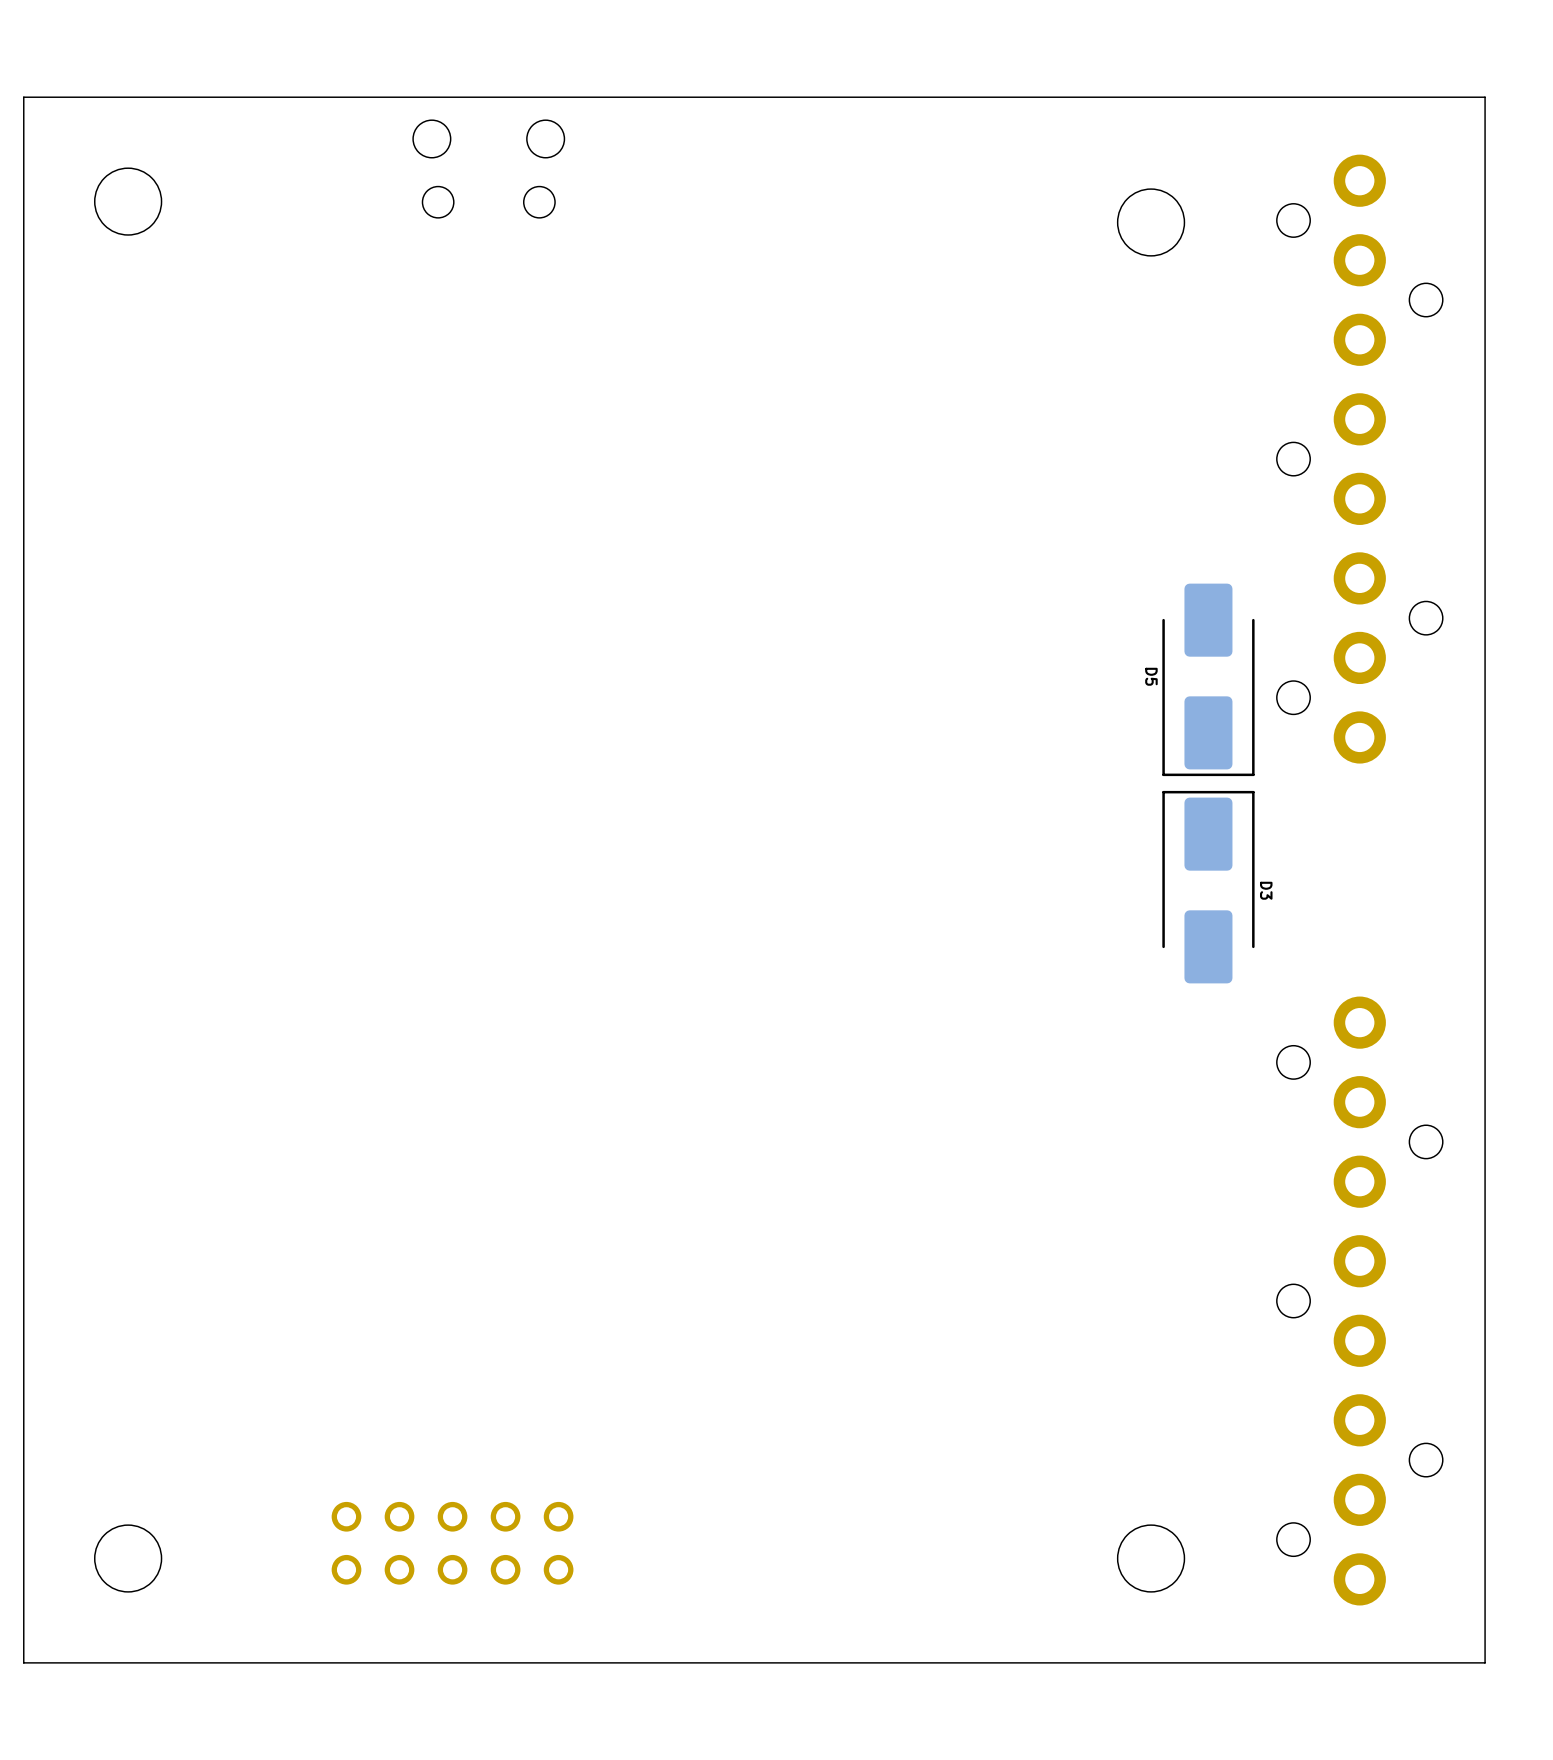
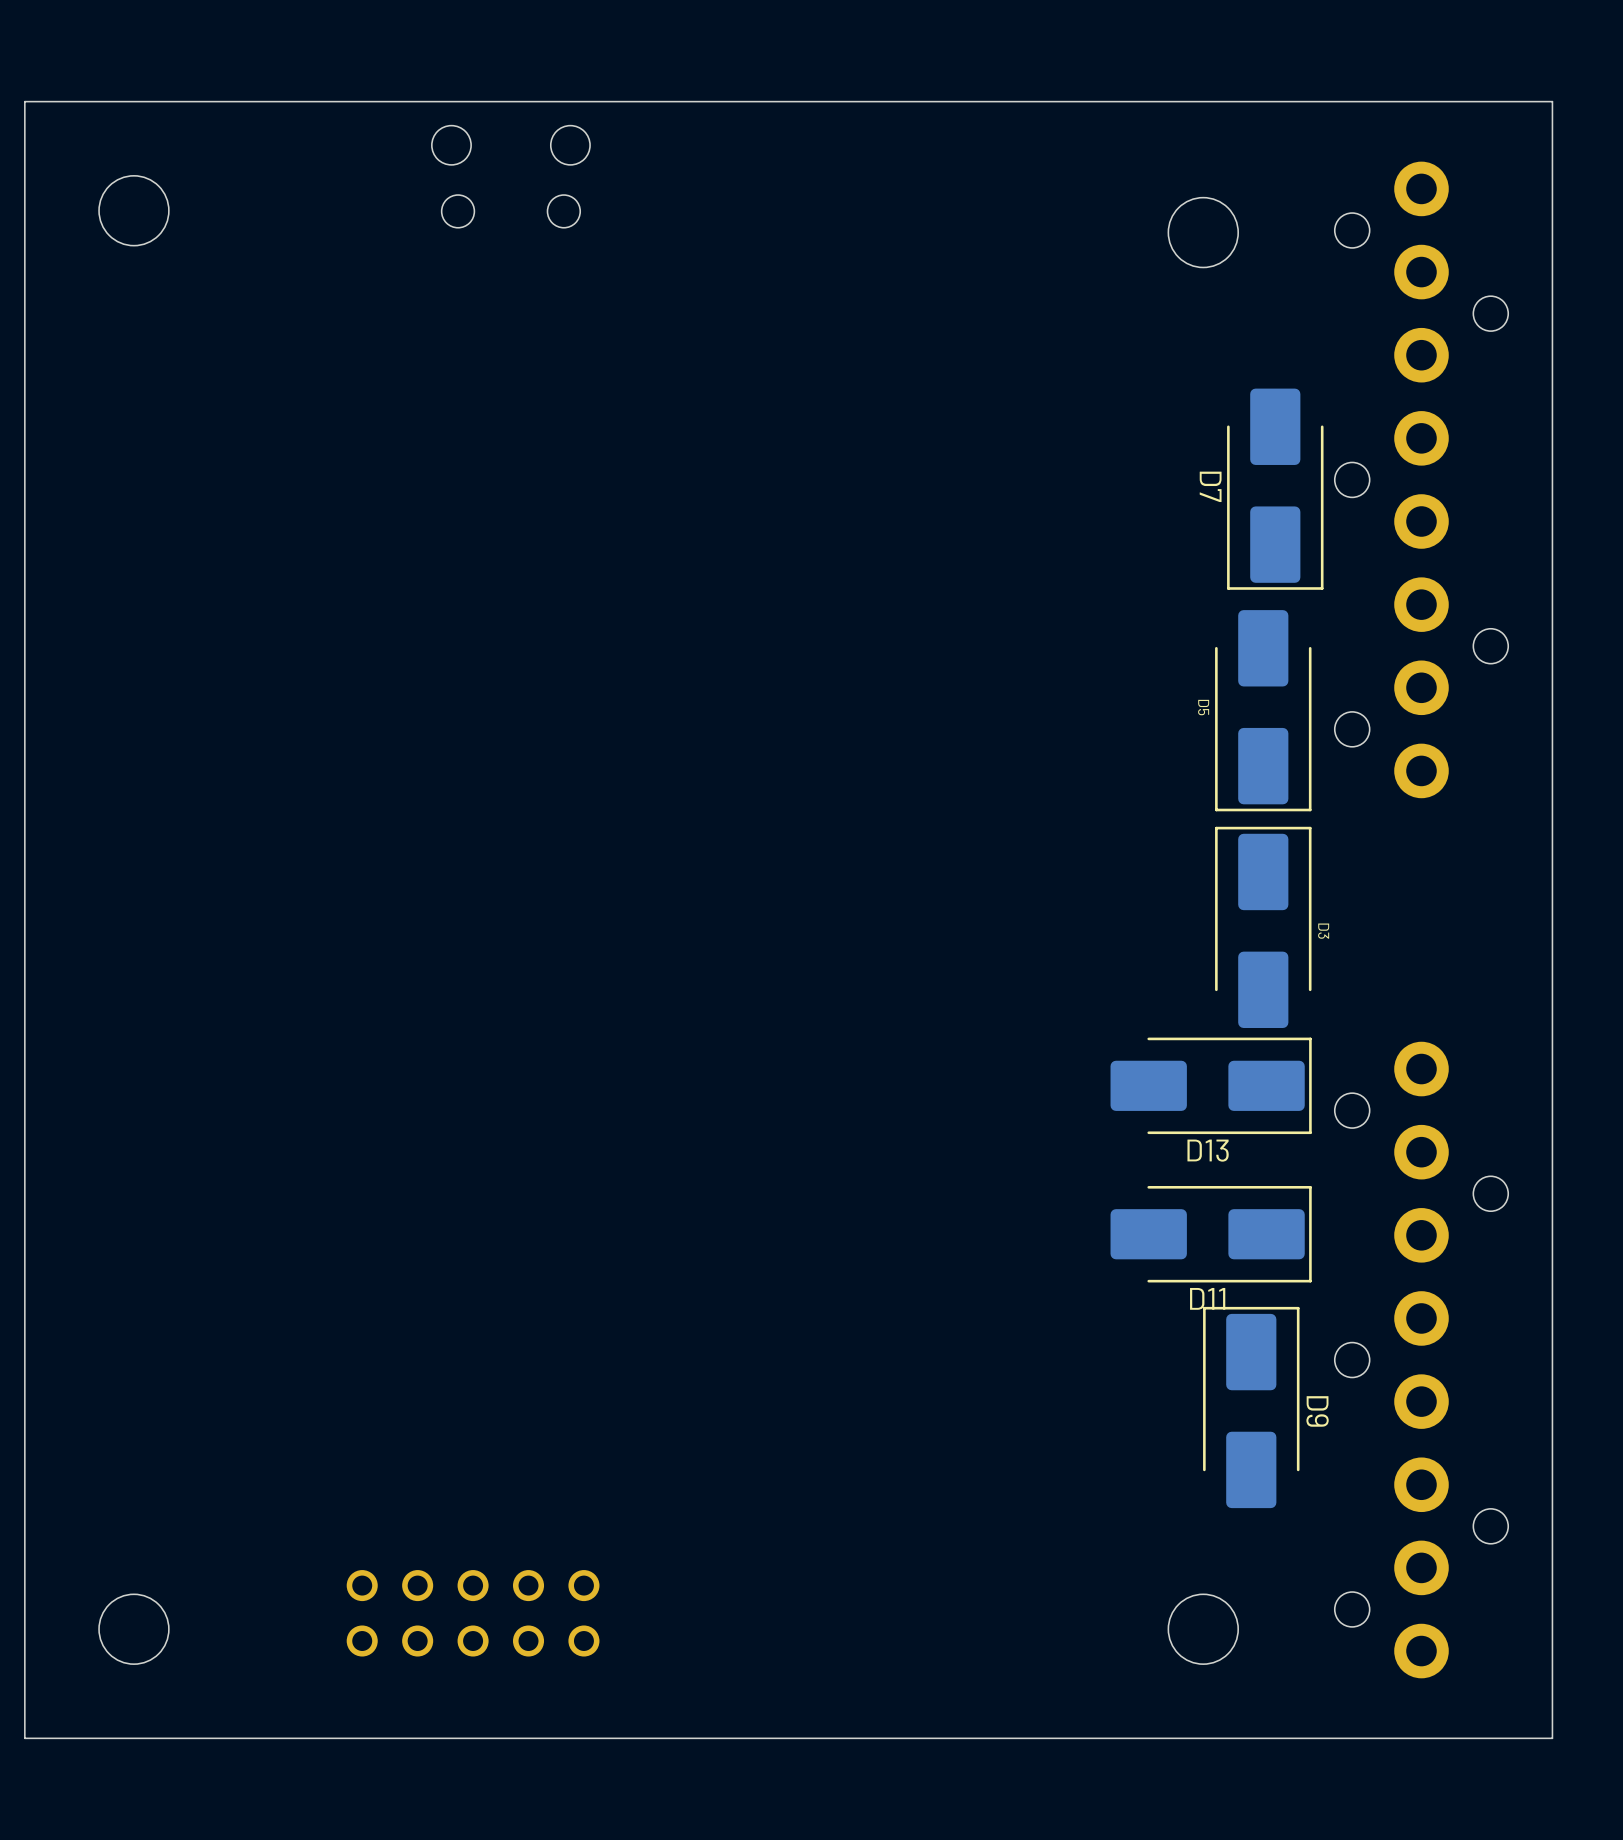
D7: none -> (1275, 489)
D13: none -> (1211, 1085)
D11: none -> (1211, 1234)
D9: none -> (1251, 1407)

